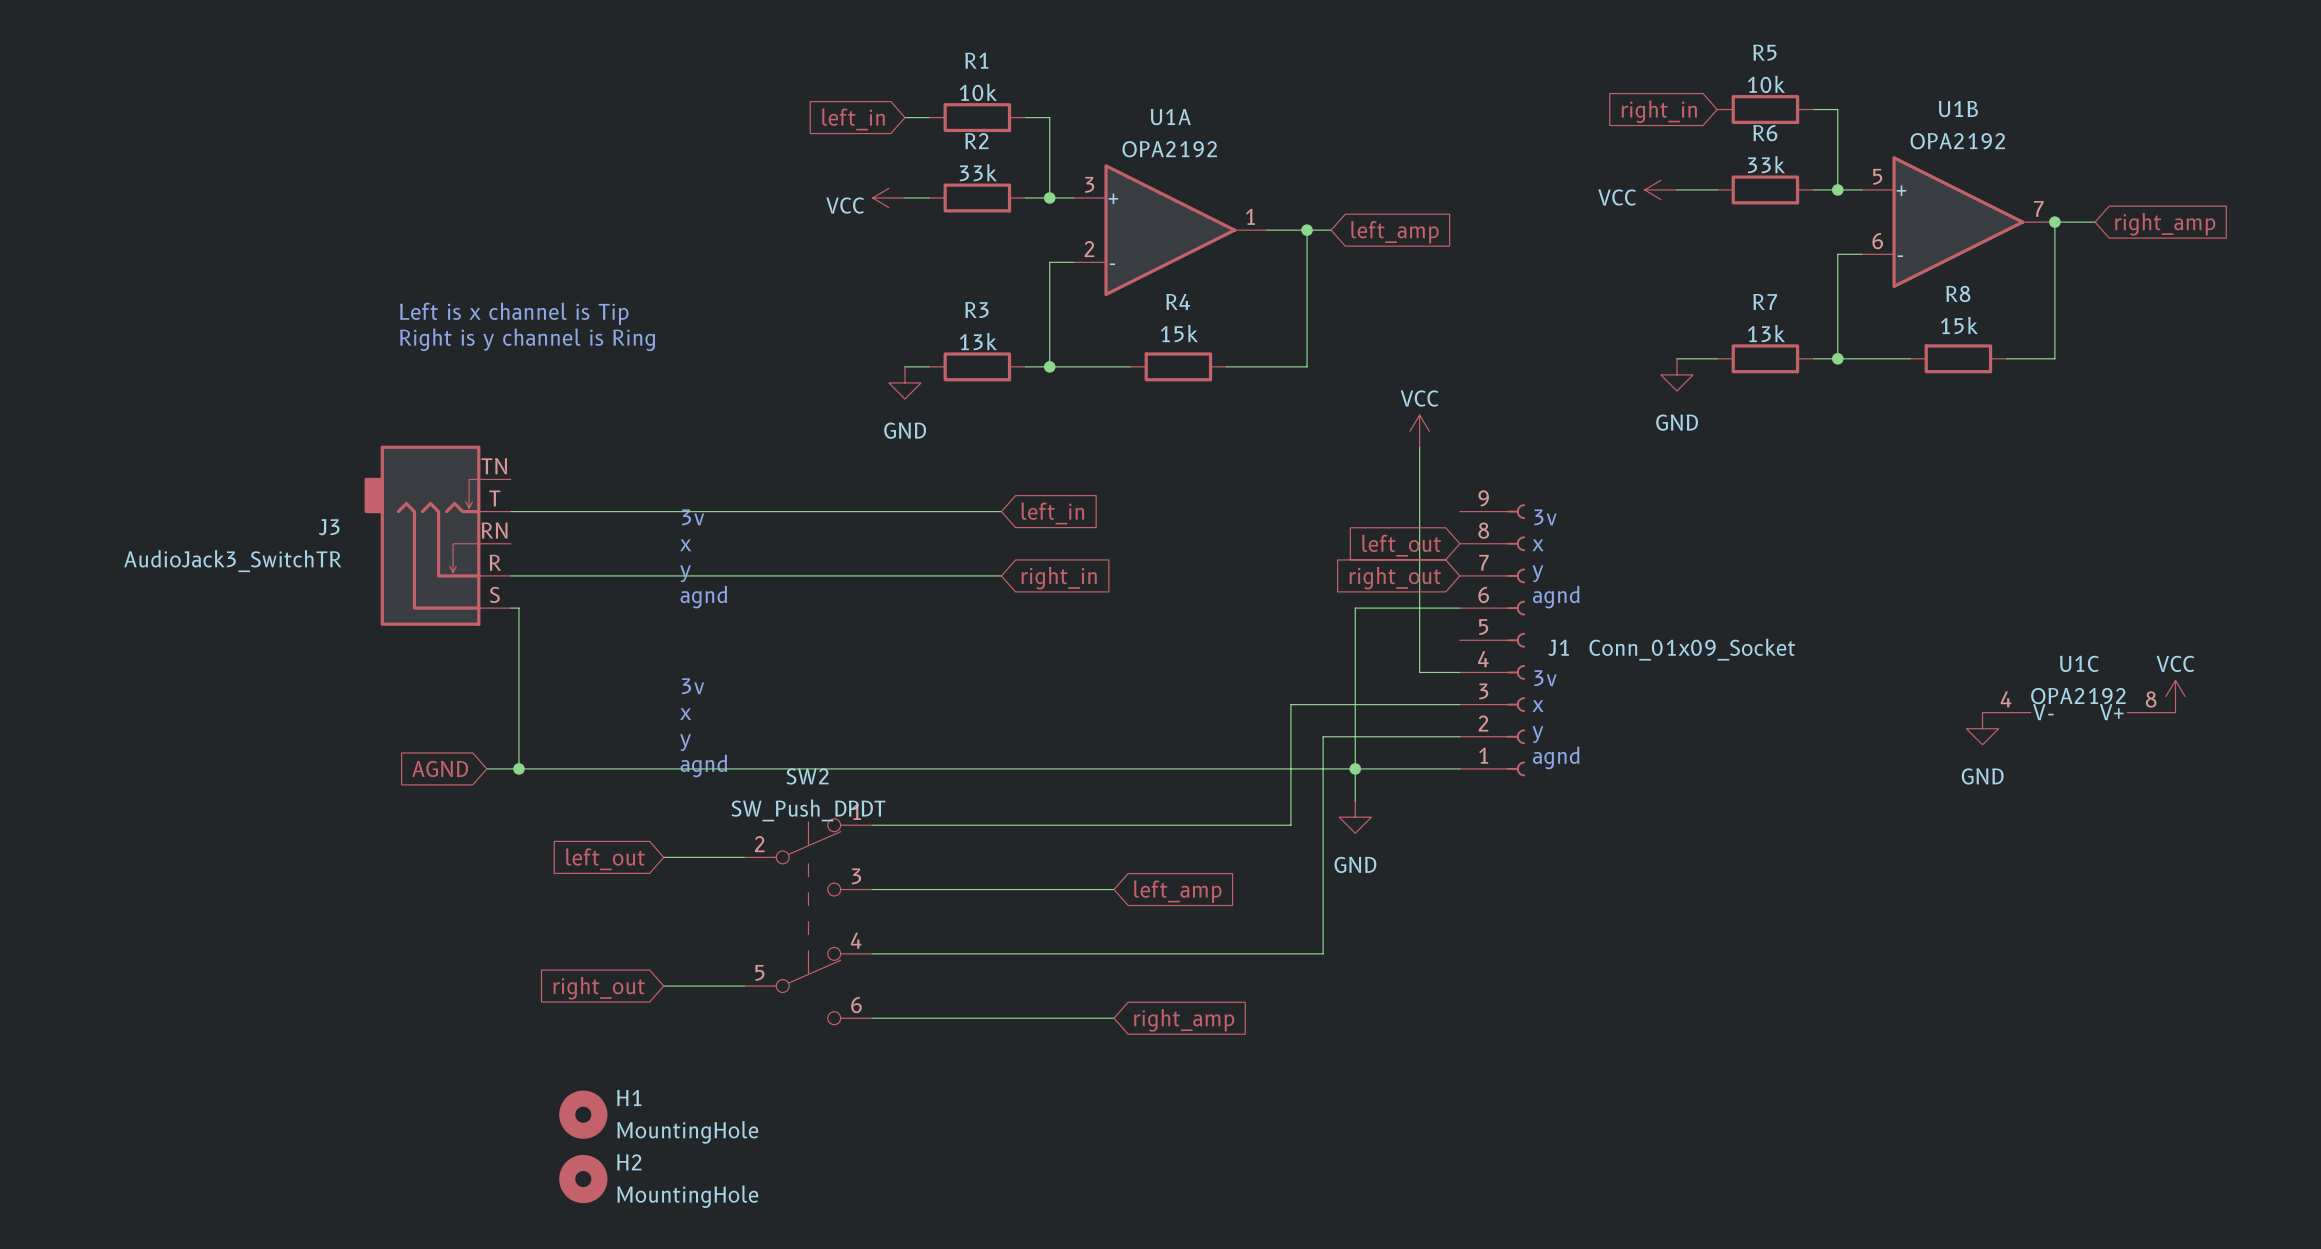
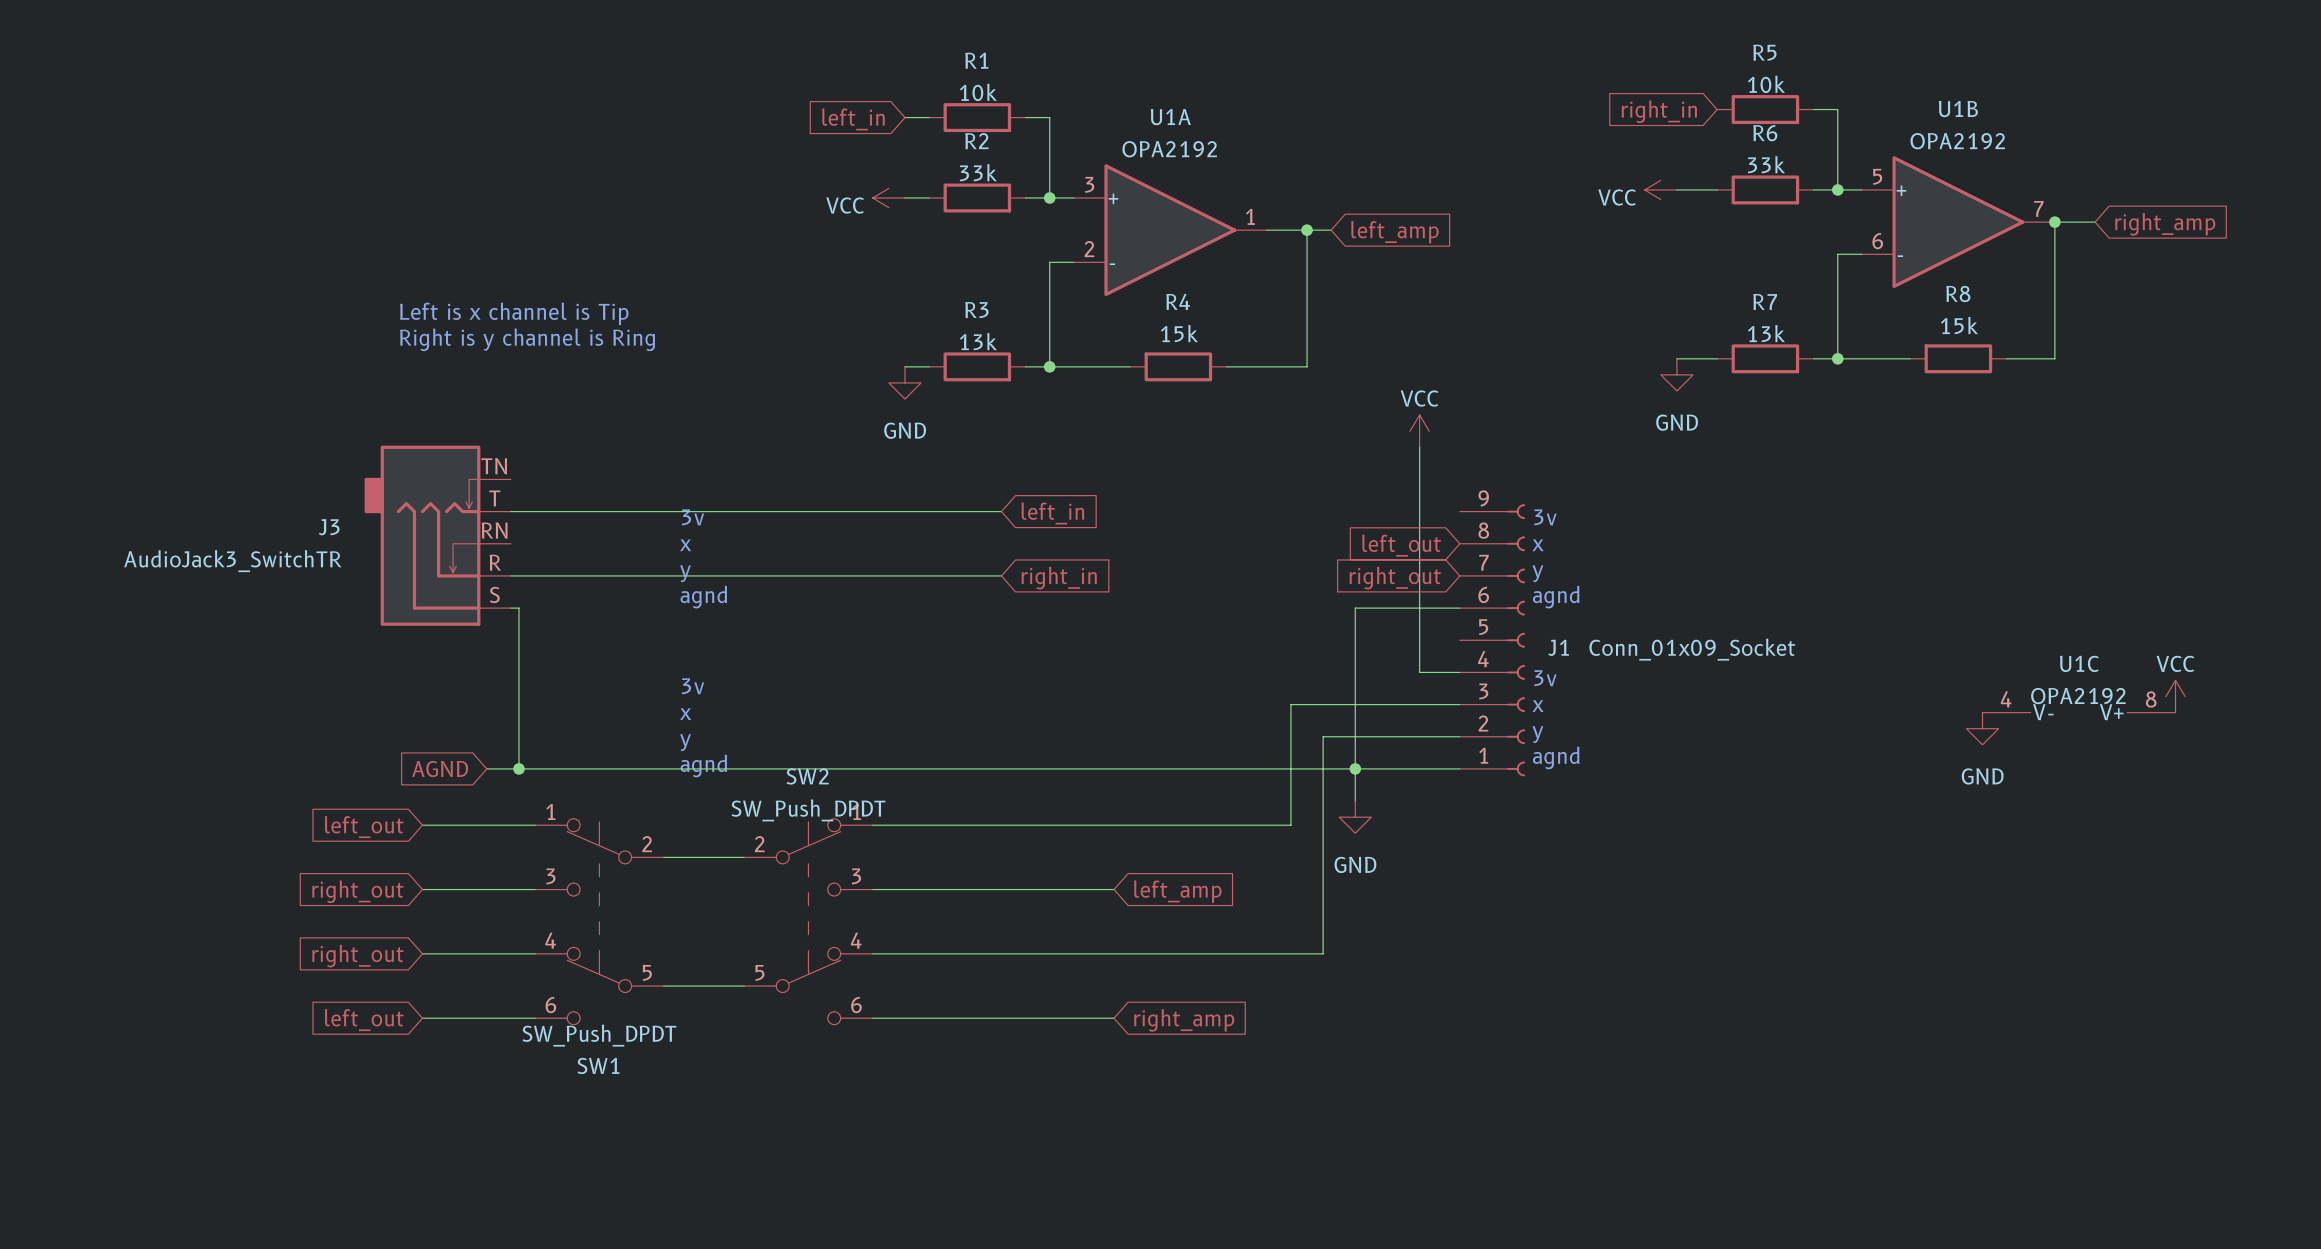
wire: none -> (422, 825) (535, 825)
global label: none -> left_out (364, 827)
global label: left_out (605, 859) -> none
wire: none -> (422, 889) (535, 889)
global label: none -> right_out (357, 891)
SW1: none -> SW_Push_DPDT (599, 921)
wire: none -> (422, 953) (535, 953)
global label: none -> right_out (357, 956)
global label: right_out (599, 988) -> none
wire: none -> (422, 1018) (535, 1018)
global label: none -> left_out (364, 1020)
H1: MountingHole (583, 1114) -> none
H2: MountingHole (583, 1179) -> none

